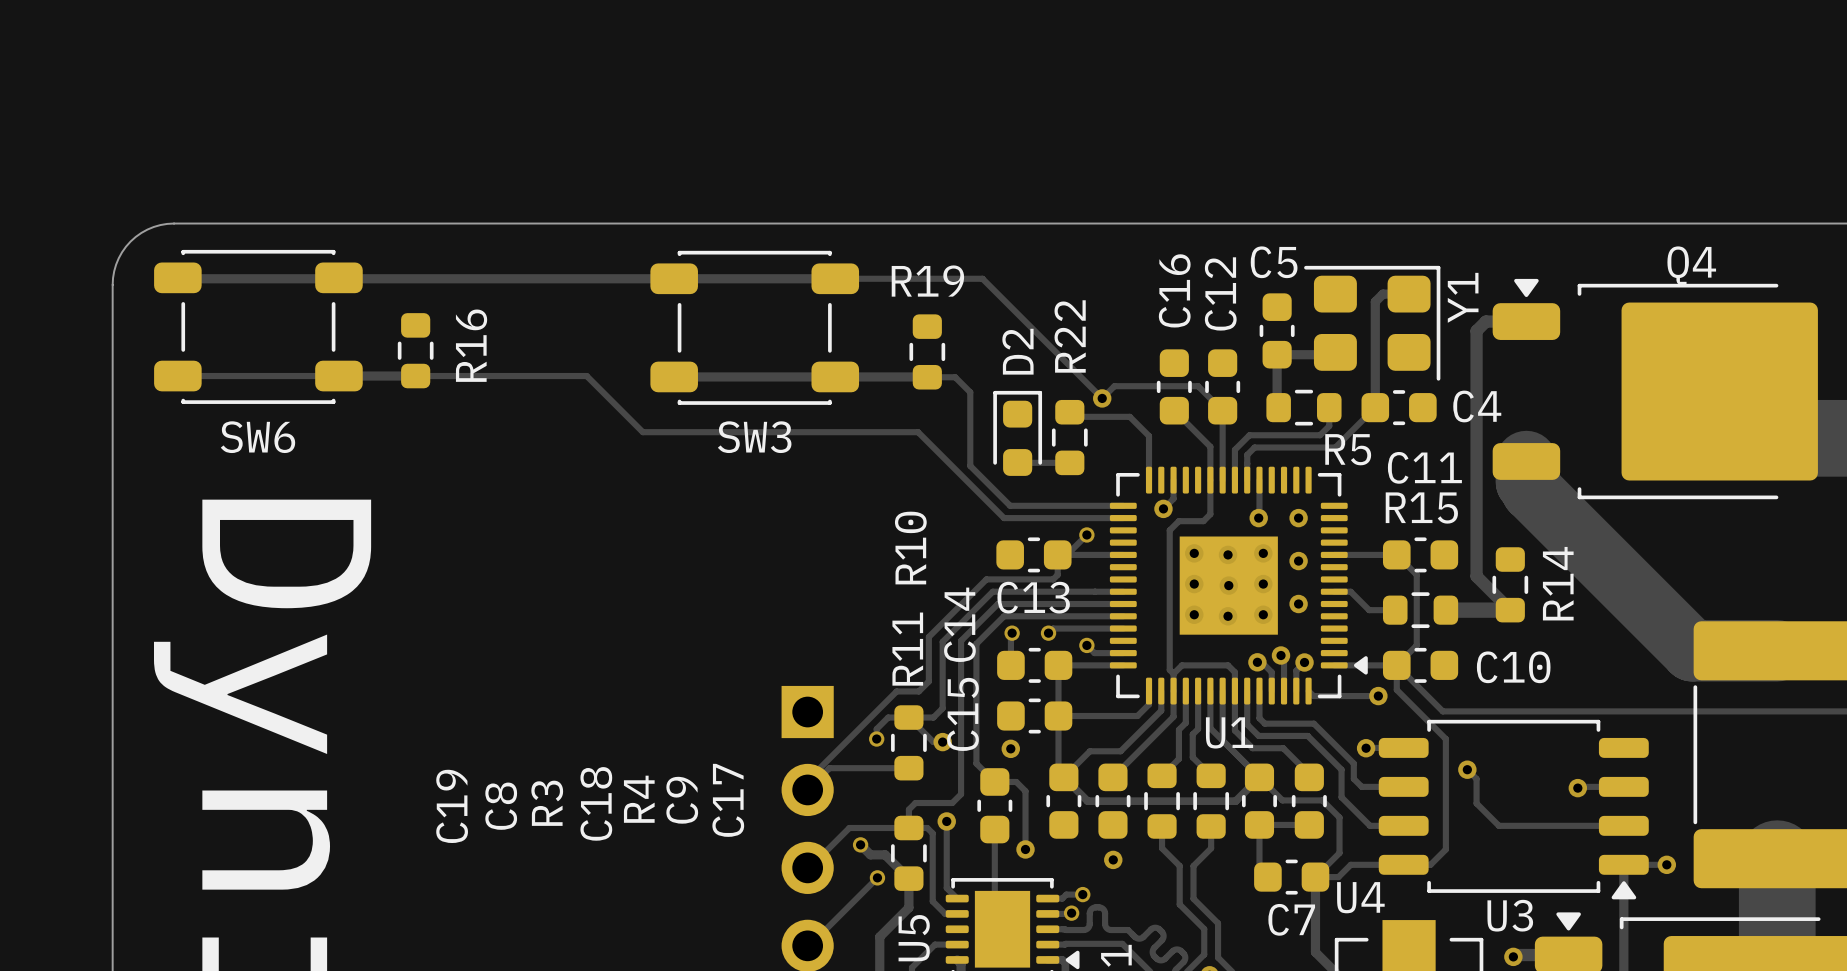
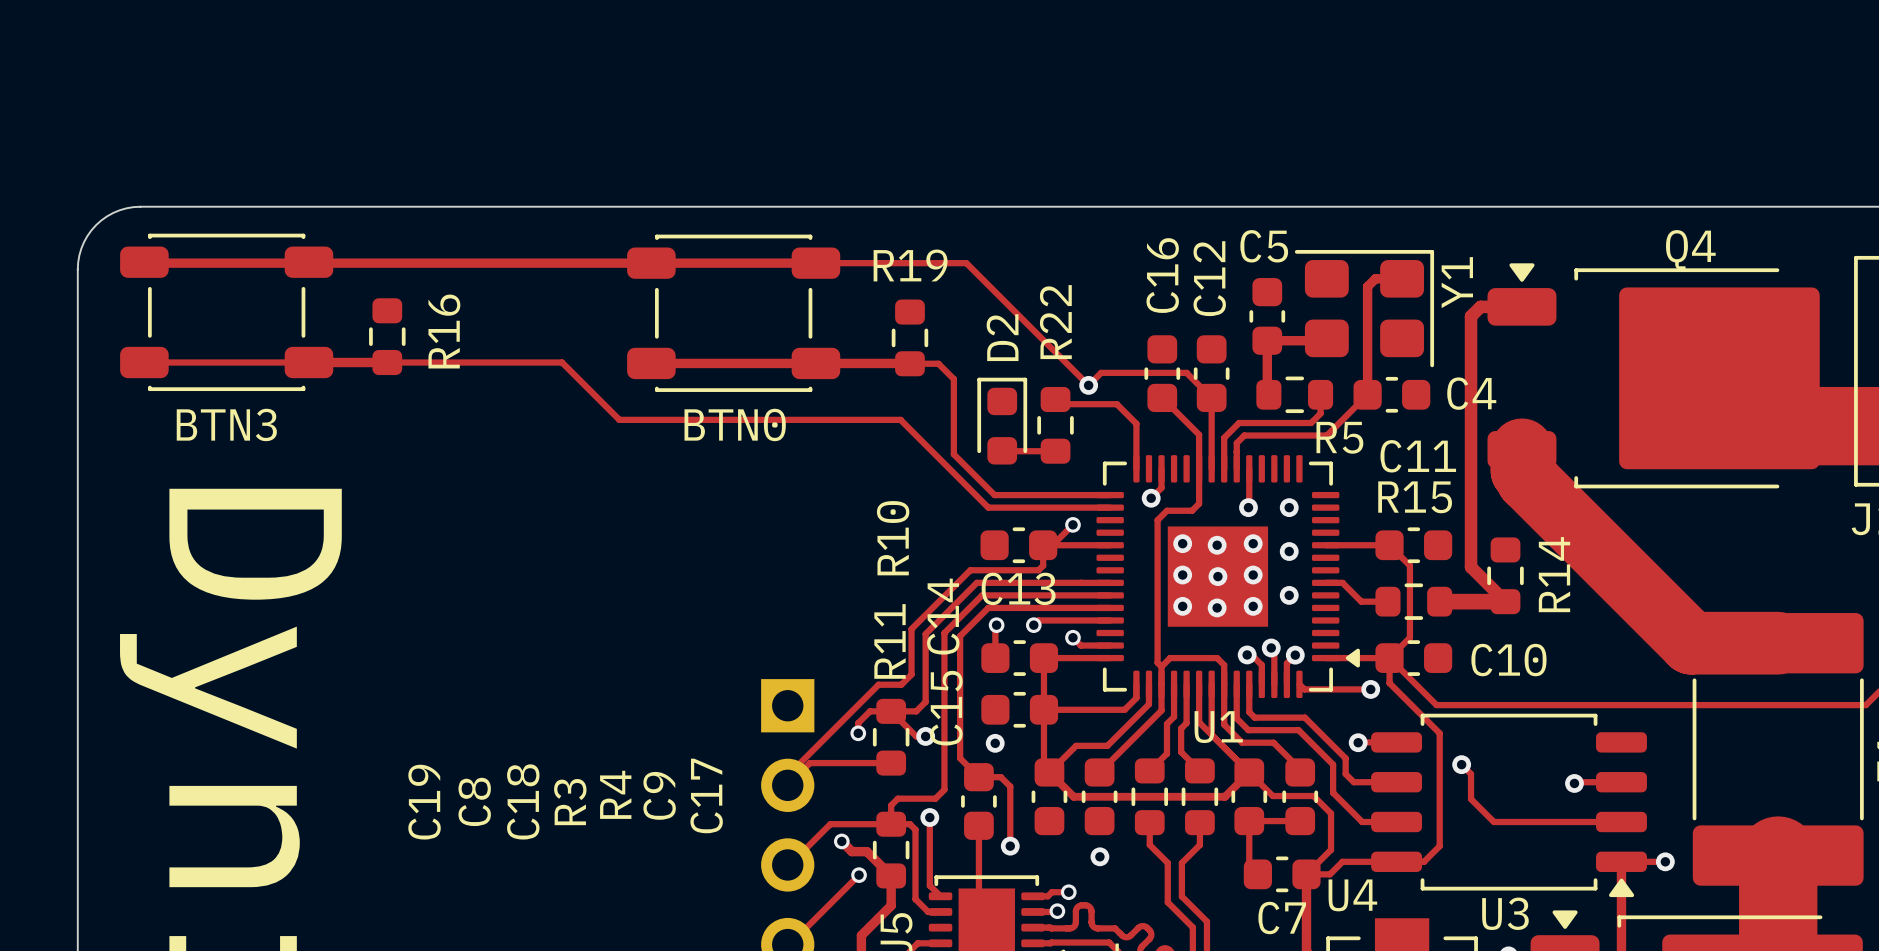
SW6 name: SW6 (258, 437) -> BTN3 (226, 424)
SW3 name: SW3 (754, 437) -> BTN0 (735, 424)
R3 name position: R3 (547, 803) -> R3 (570, 802)
C18 name position: C18 (596, 803) -> C18 (523, 801)

